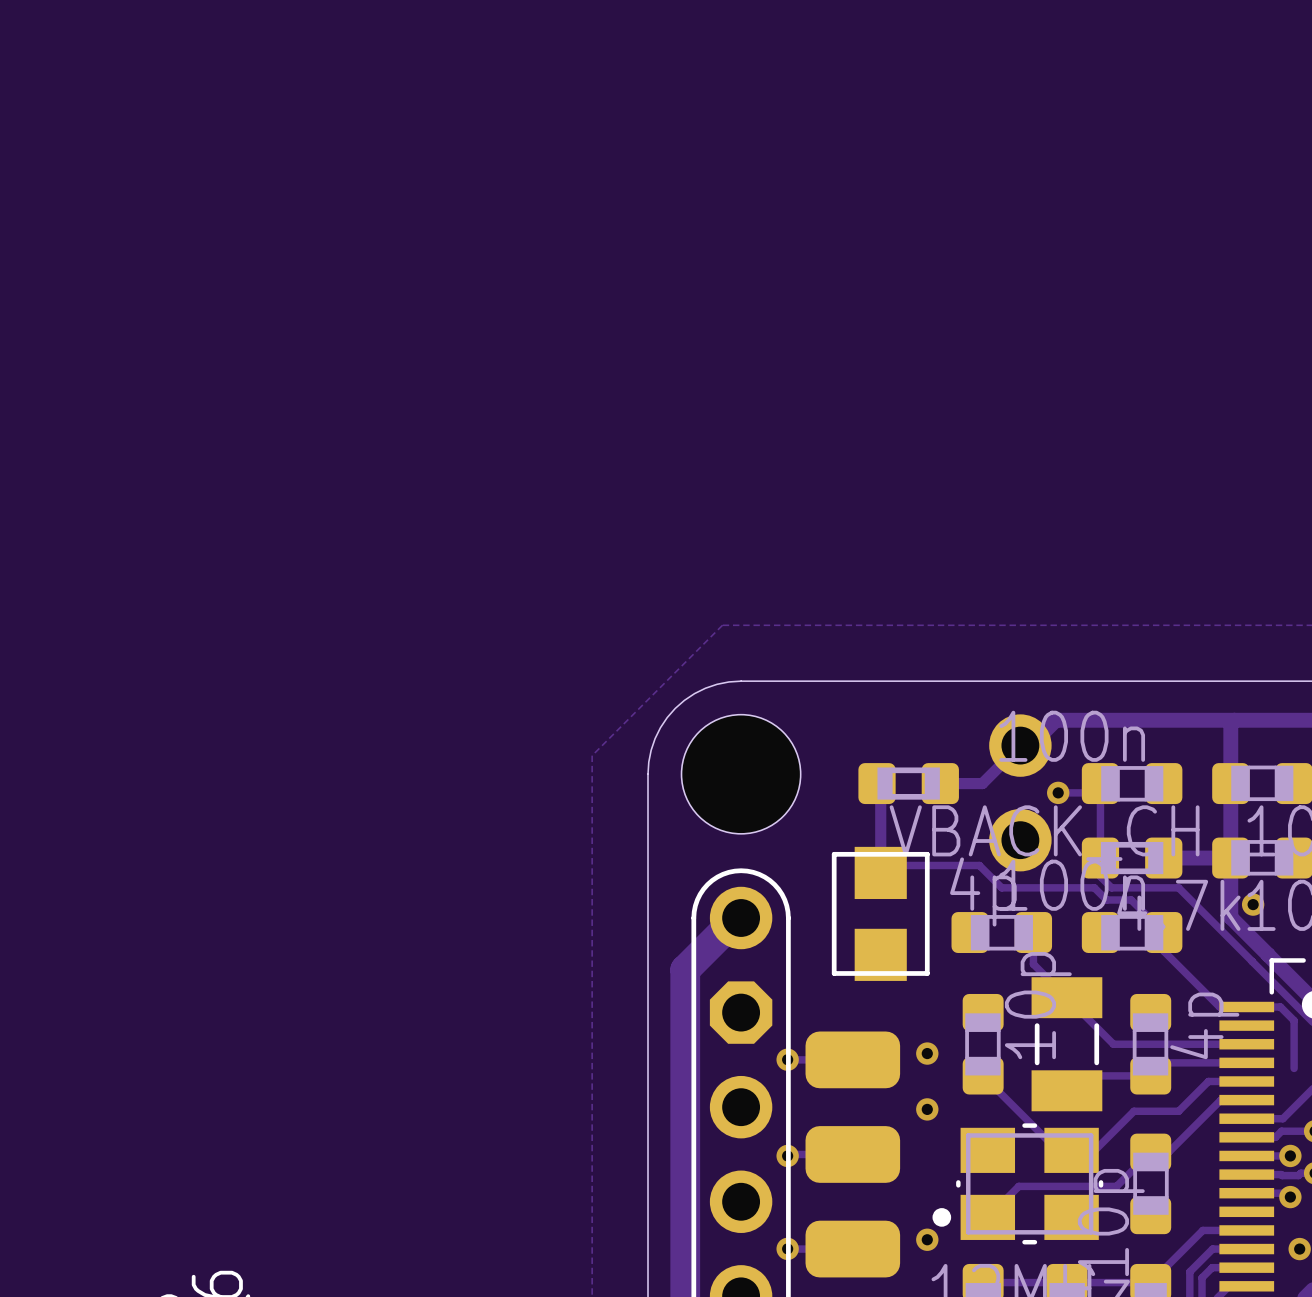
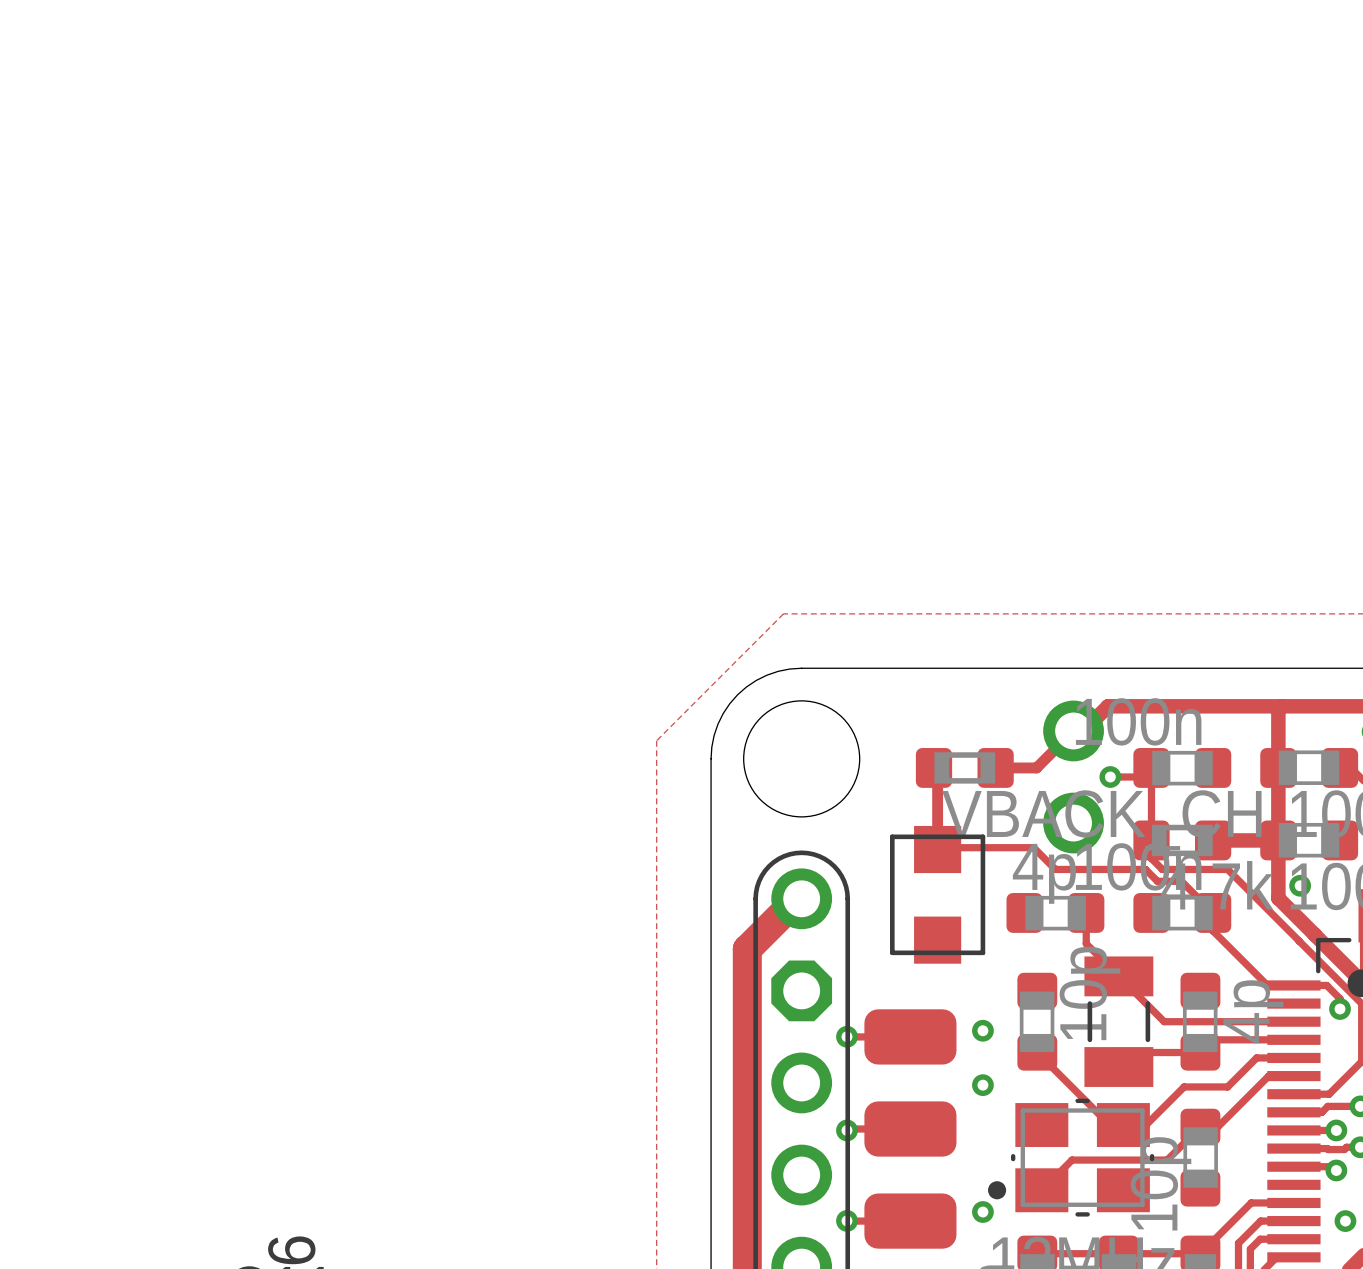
part footprint: [831, 846, 930, 981] -> [890, 825, 986, 964]
track: (1294, 1031) (1294, 1068) -> none
via: none -> (1340, 1009)

